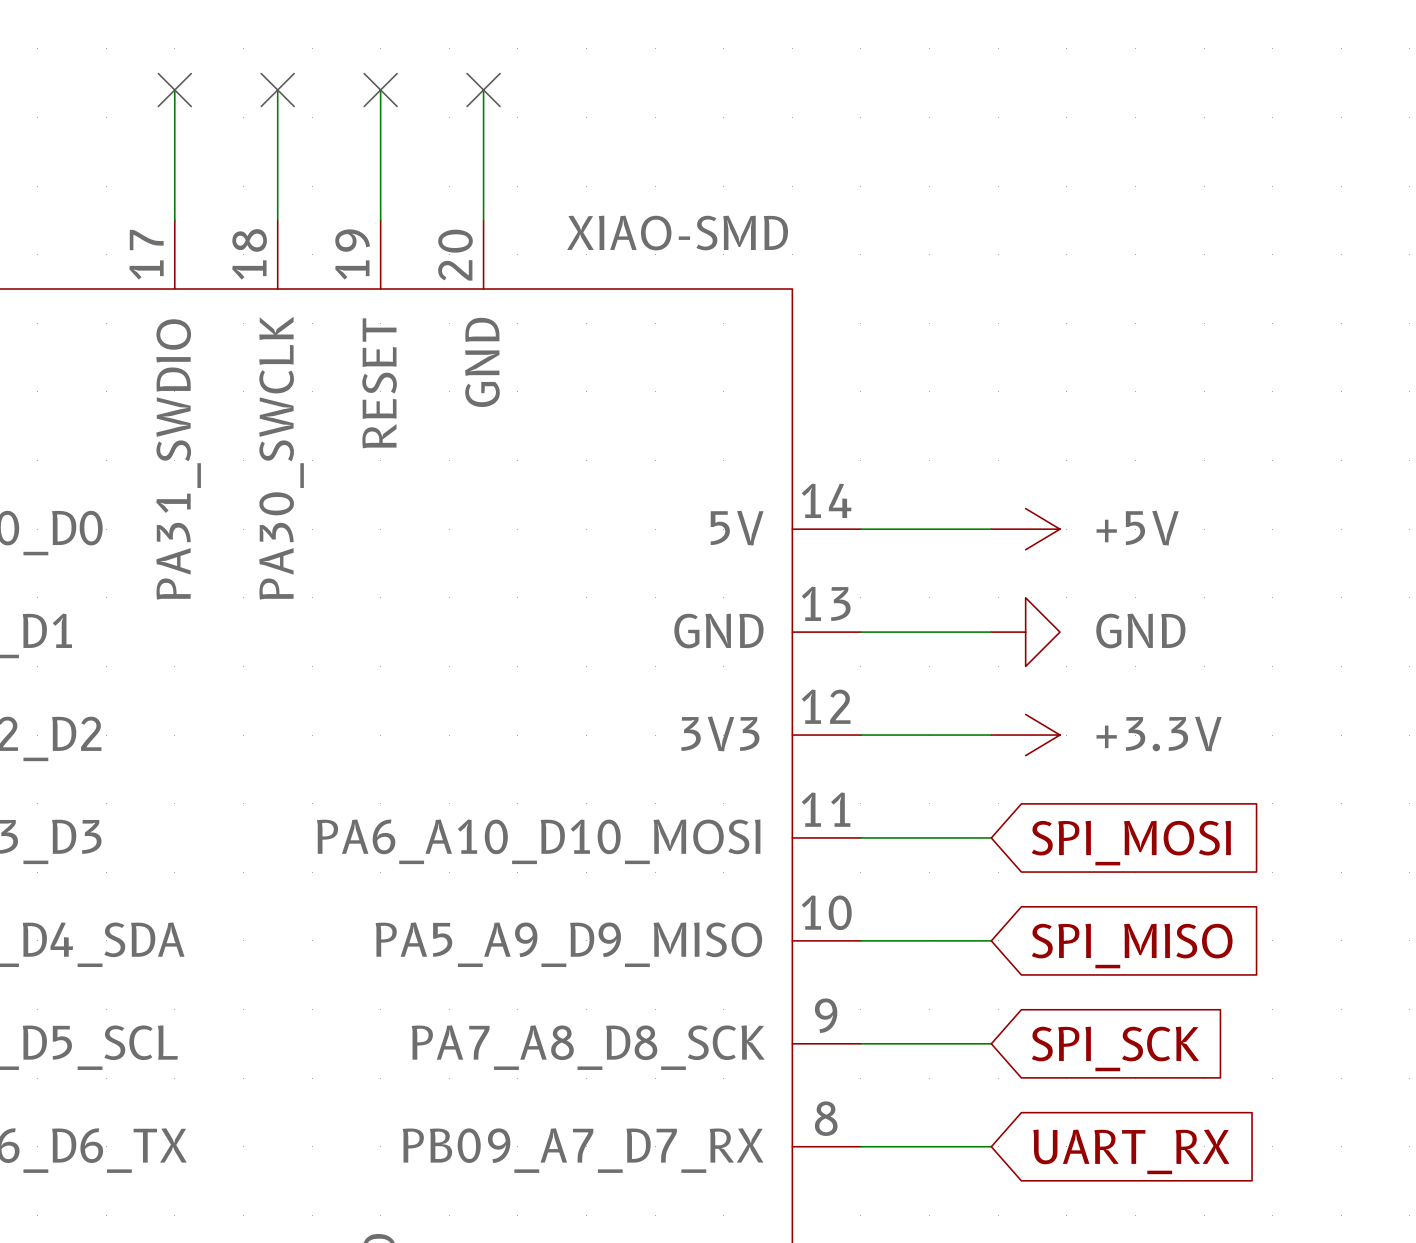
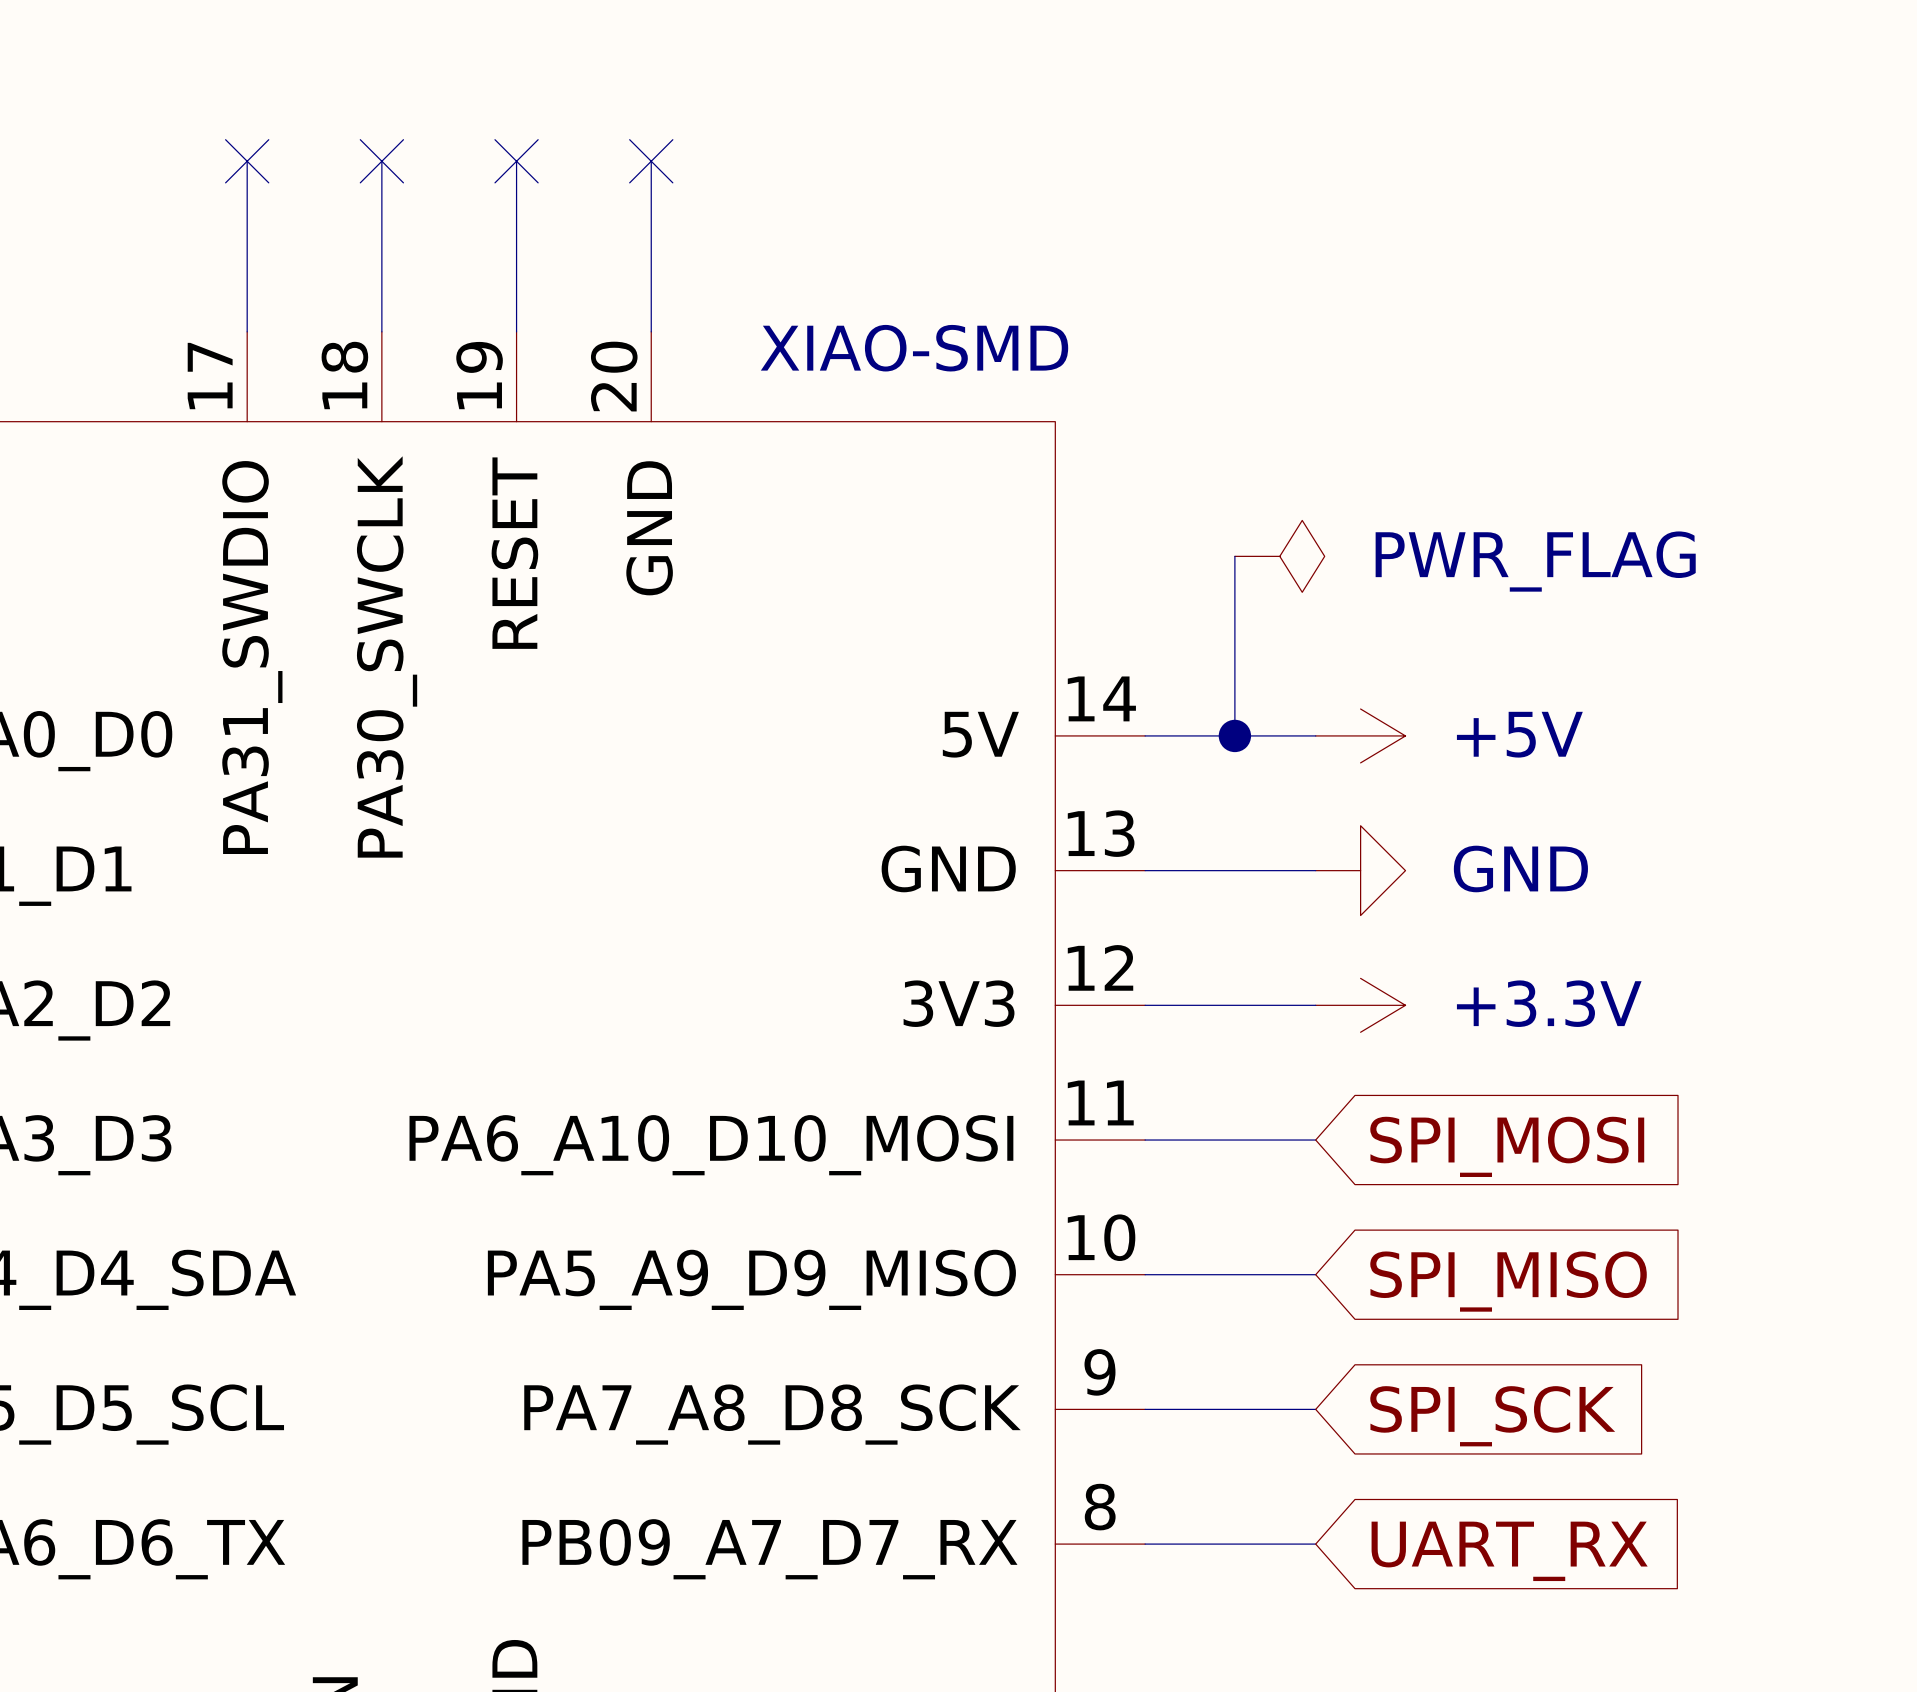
wire: none -> (1234, 556) (1234, 735)
power symbol: none -> PWR_FLAG (1279, 556)
junction: none -> (1234, 735)

